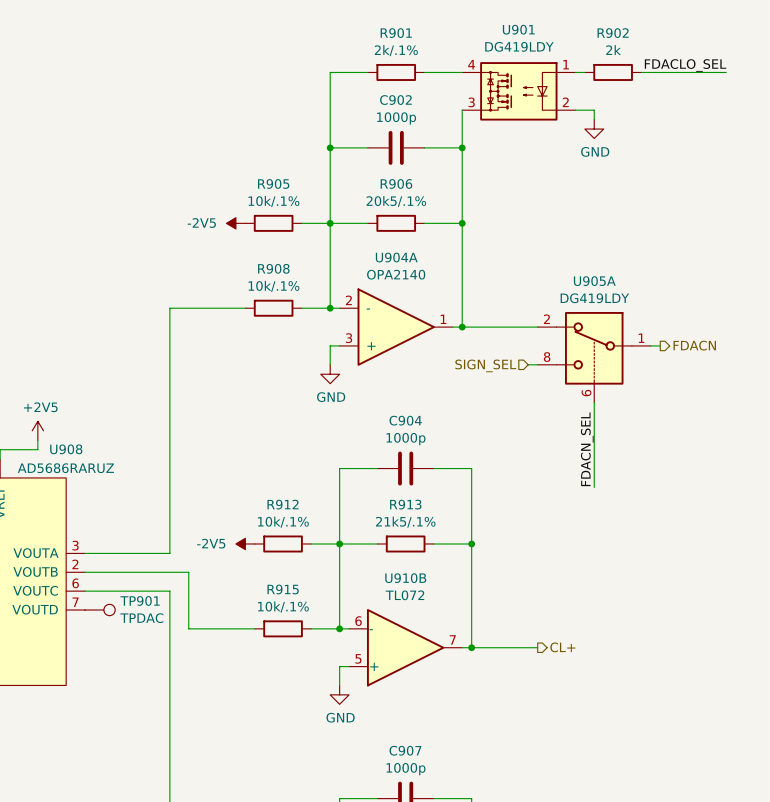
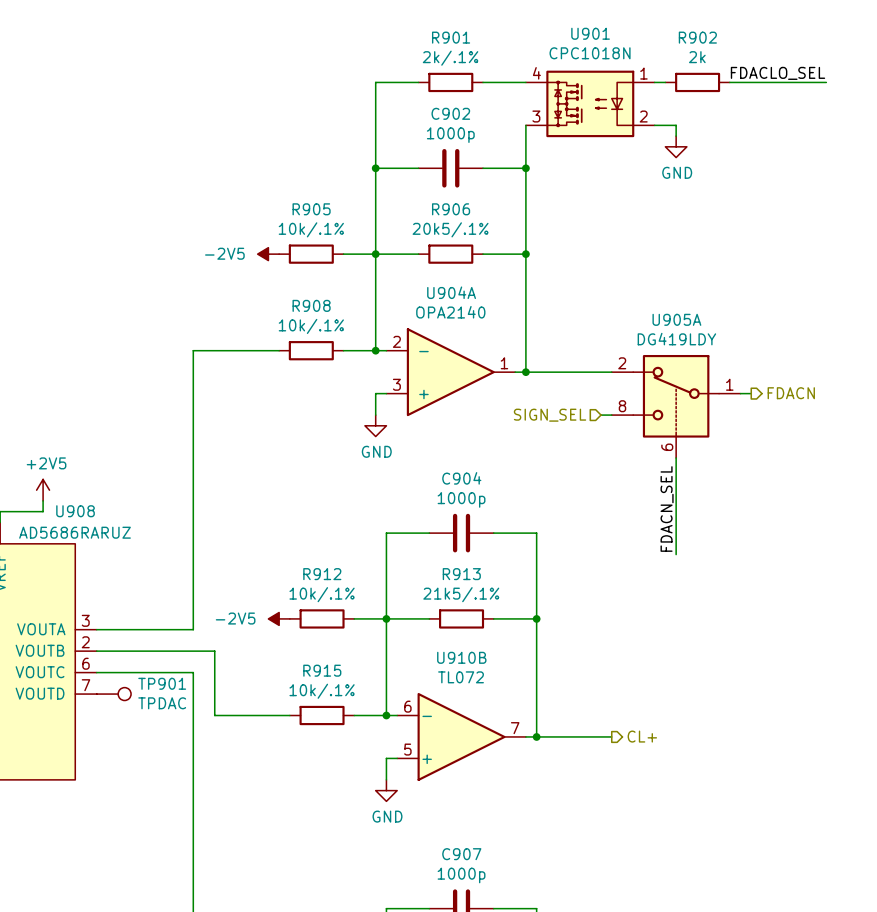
U901 value: DG419LDY (519, 46) -> CPC1018N (590, 53)

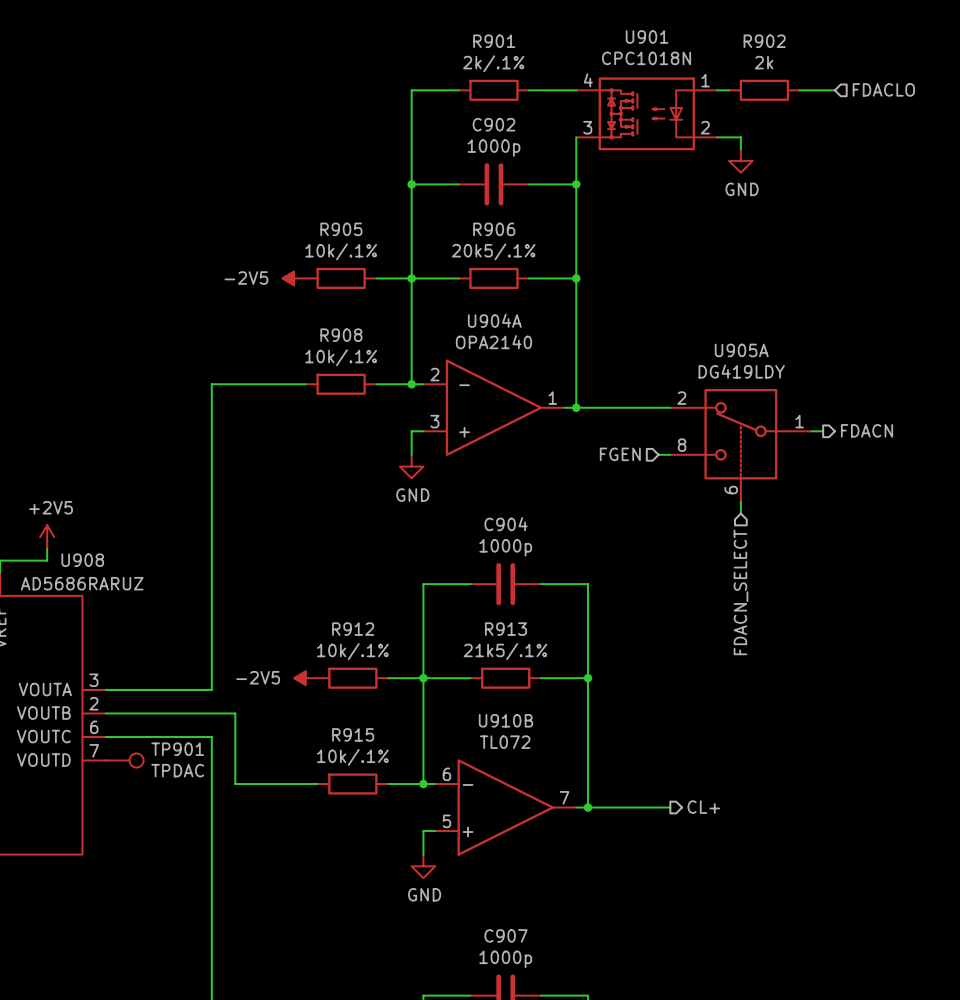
label: FDACLO_SEL (777, 73) -> none
wire: (761, 82) (826, 82) -> none
hierarchical label: none -> FDACLO (883, 89)
hierarchical label: SIGN_SEL (550, 415) -> FGEN (620, 454)
wire: (676, 468) (676, 554) -> none
label: FDACN_SEL (667, 509) -> none
hierarchical label: none -> FDACN_SELECT (740, 592)

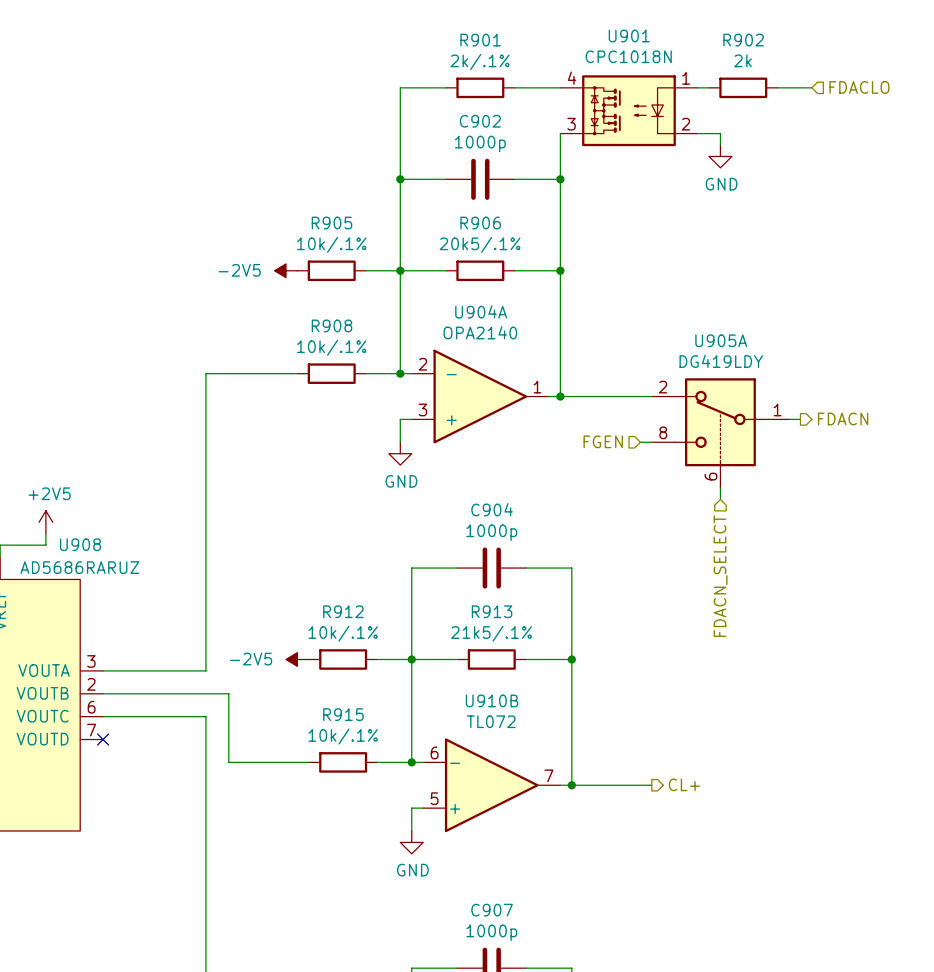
no-connect mark: none -> (103, 739)
TP901: TPDAC (124, 760) -> none

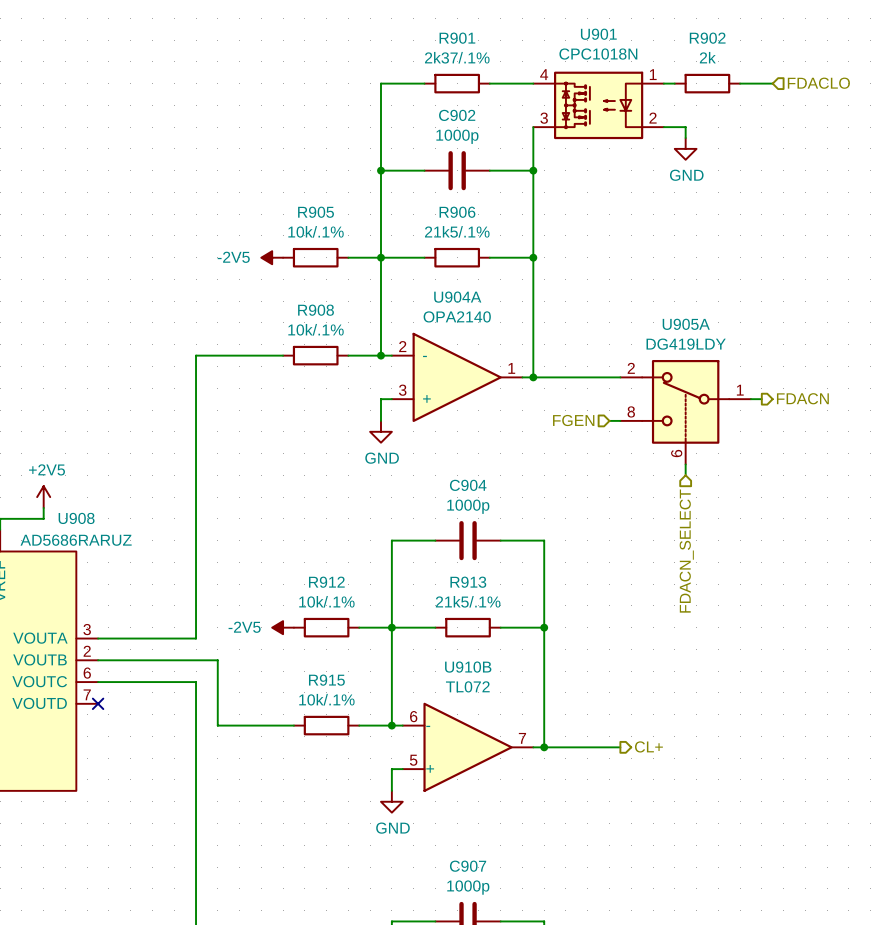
R901 value: 2k/.1% (480, 61) -> 2k37/.1% (457, 57)
R906 value: 20k5/.1% (480, 244) -> 21k5/.1% (457, 231)

